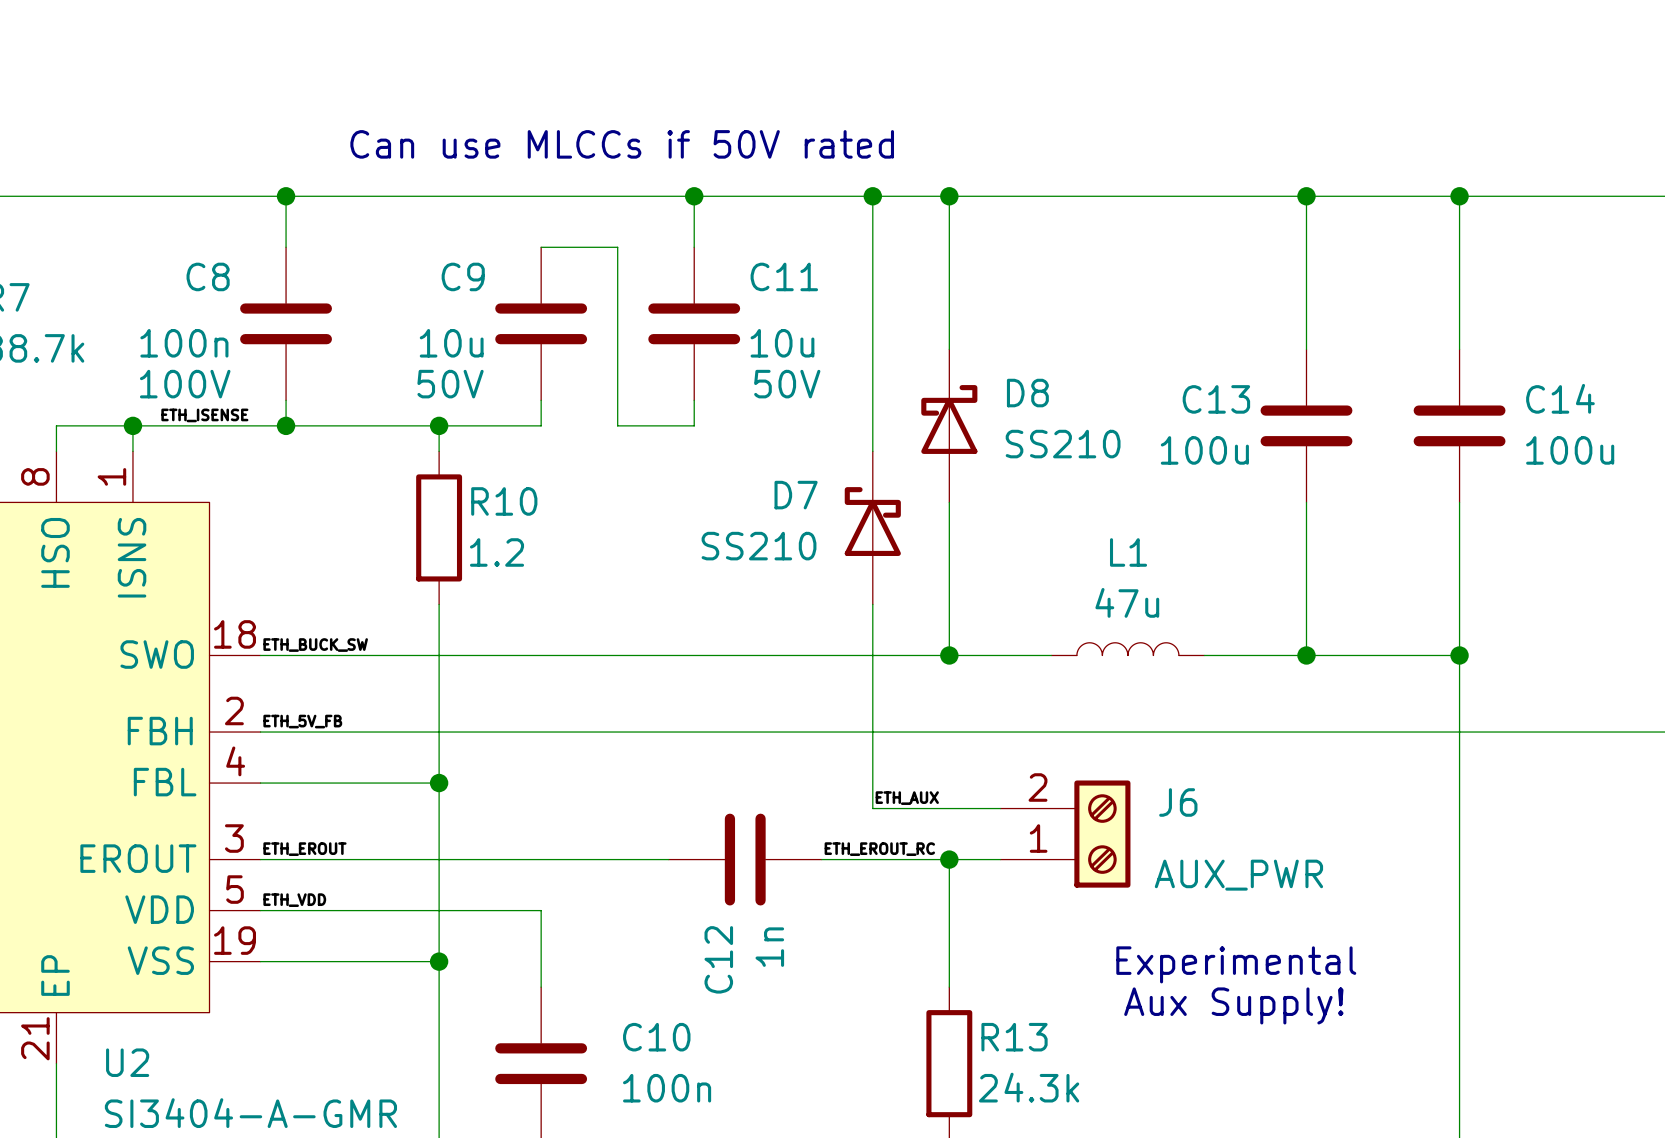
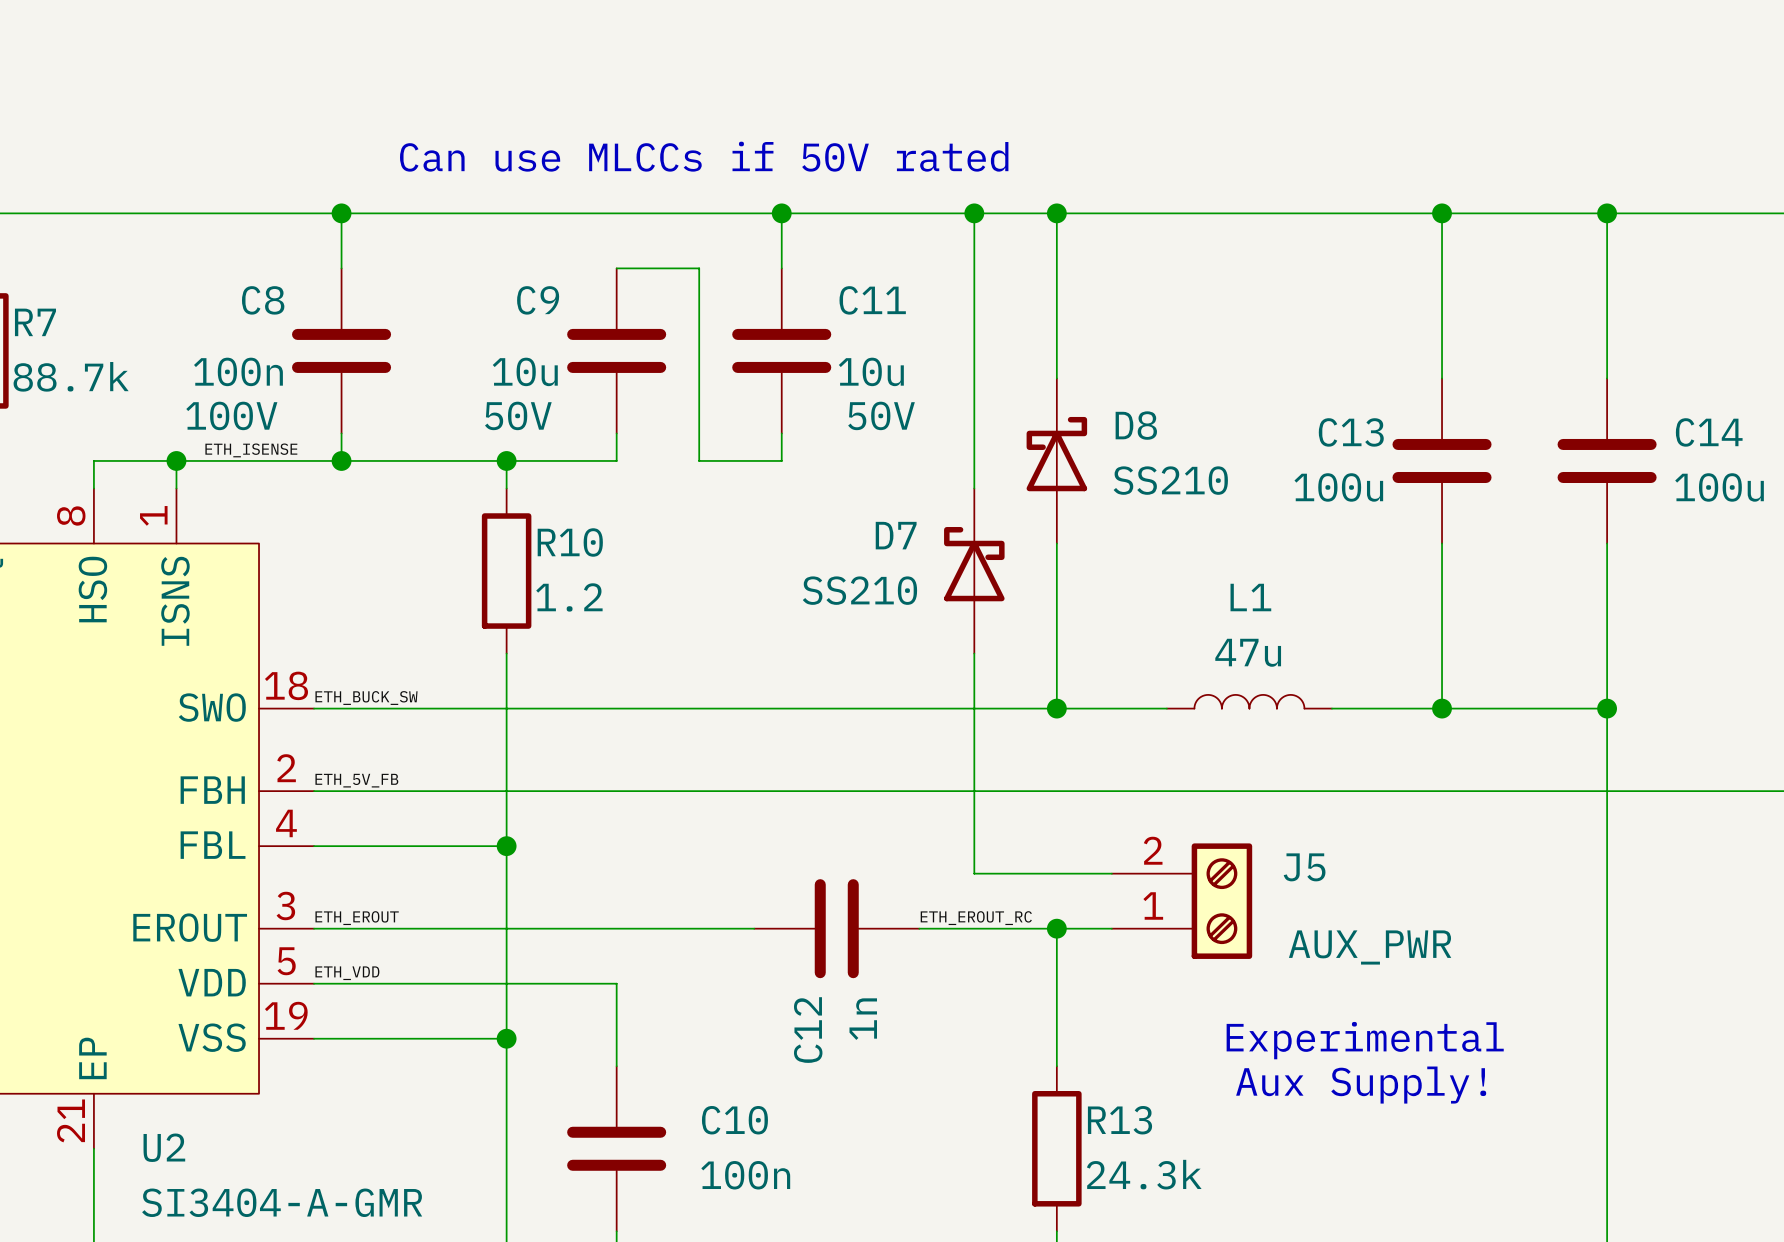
label: ETH_AUX (907, 798) -> none
J6 name: J6 (1178, 802) -> J5 (1304, 867)

